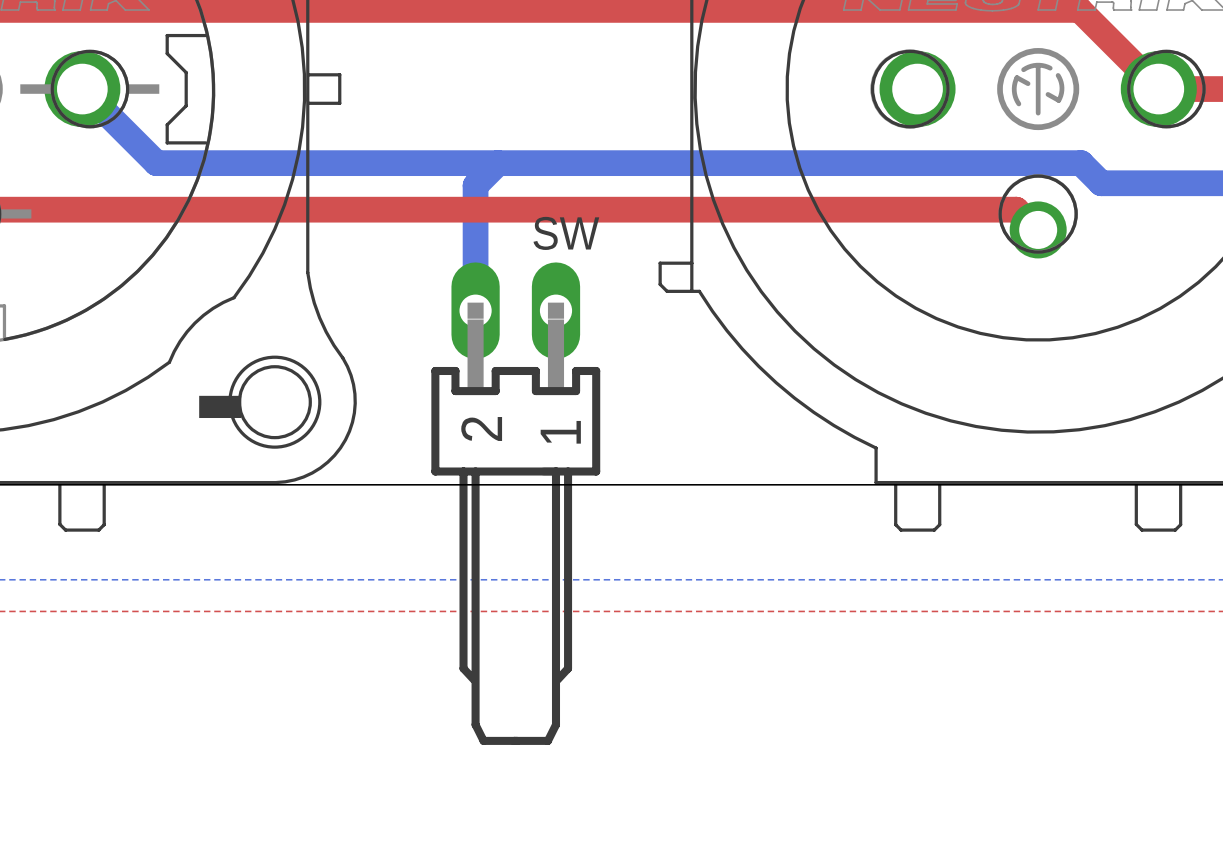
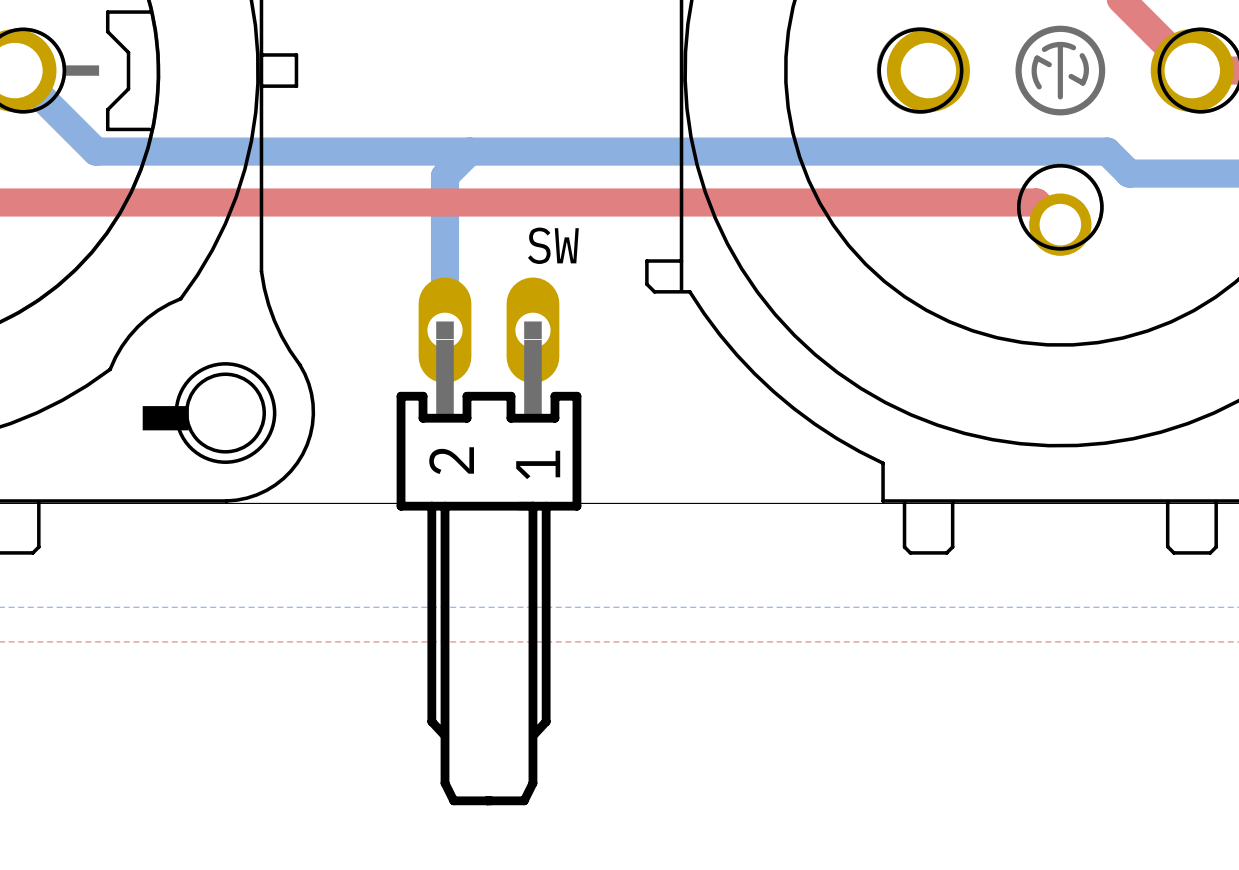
SW position: (515, 503) -> (488, 541)

